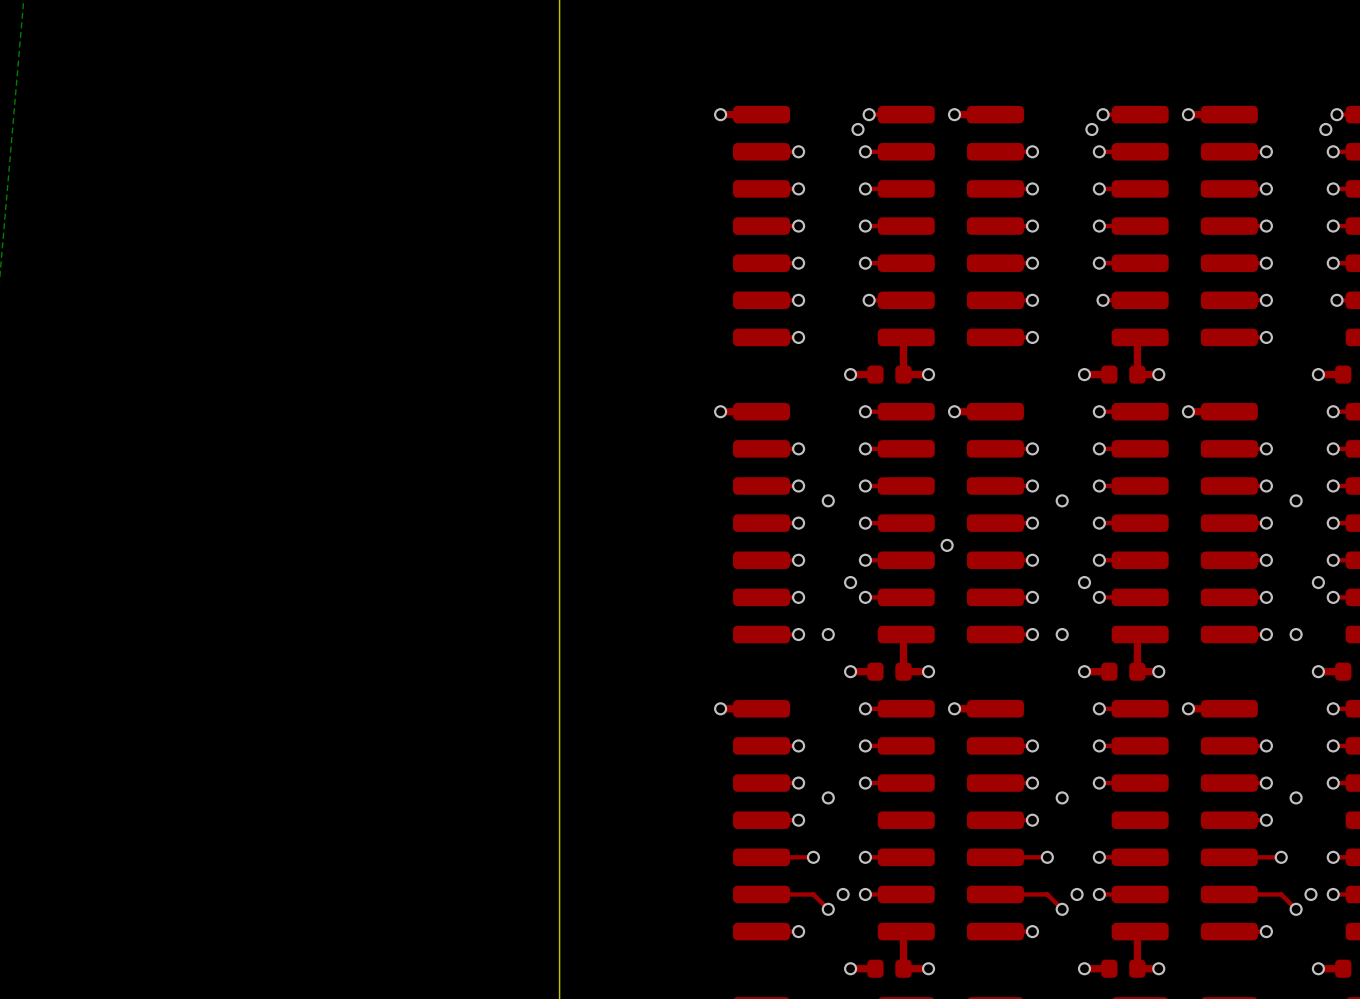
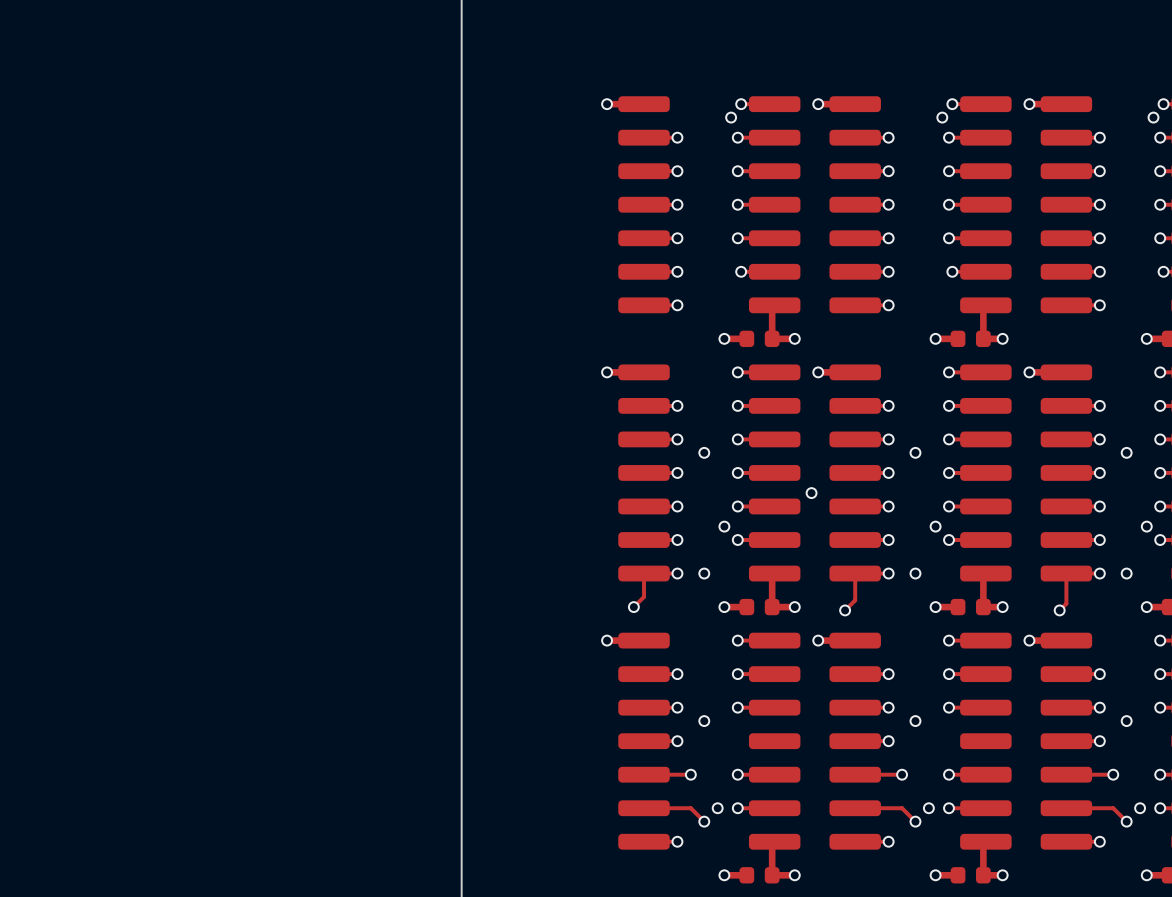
top track: none -> (644, 573) (644, 596) (633, 607)
top track: none -> (855, 573) (855, 600) (845, 610)
top track: none -> (1066, 573) (1066, 603) (1059, 610)
via: none -> (633, 607)
via: none -> (845, 610)
via: none -> (1059, 610)

